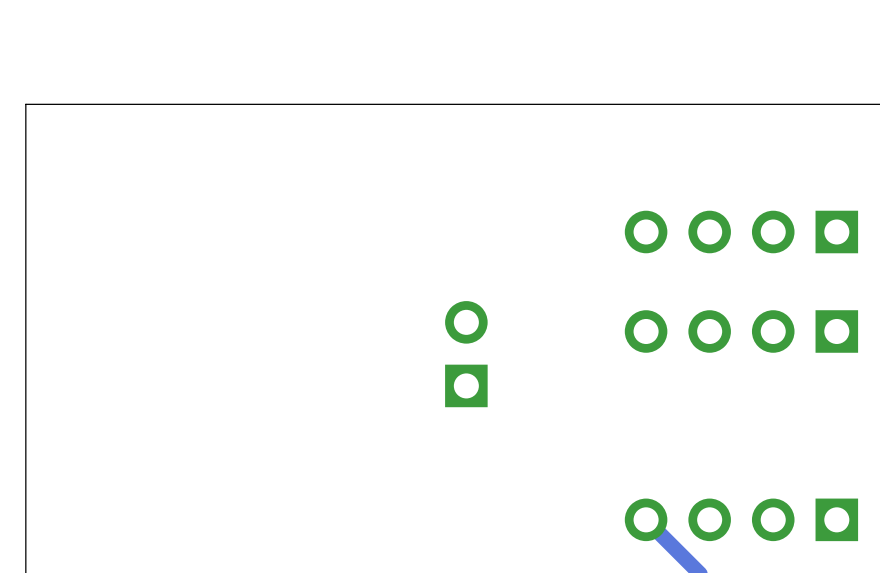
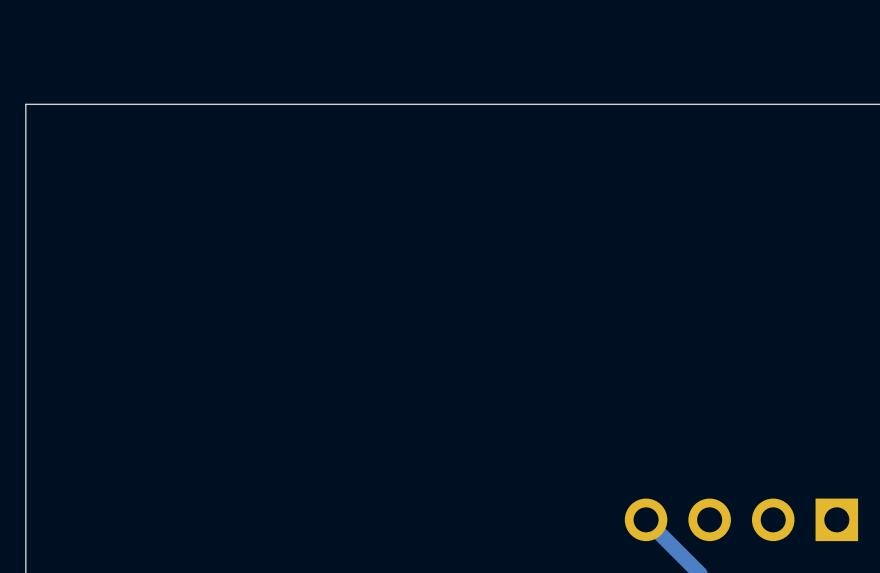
part: (741, 231) -> none
part: (741, 331) -> none
part: (466, 354) -> none

